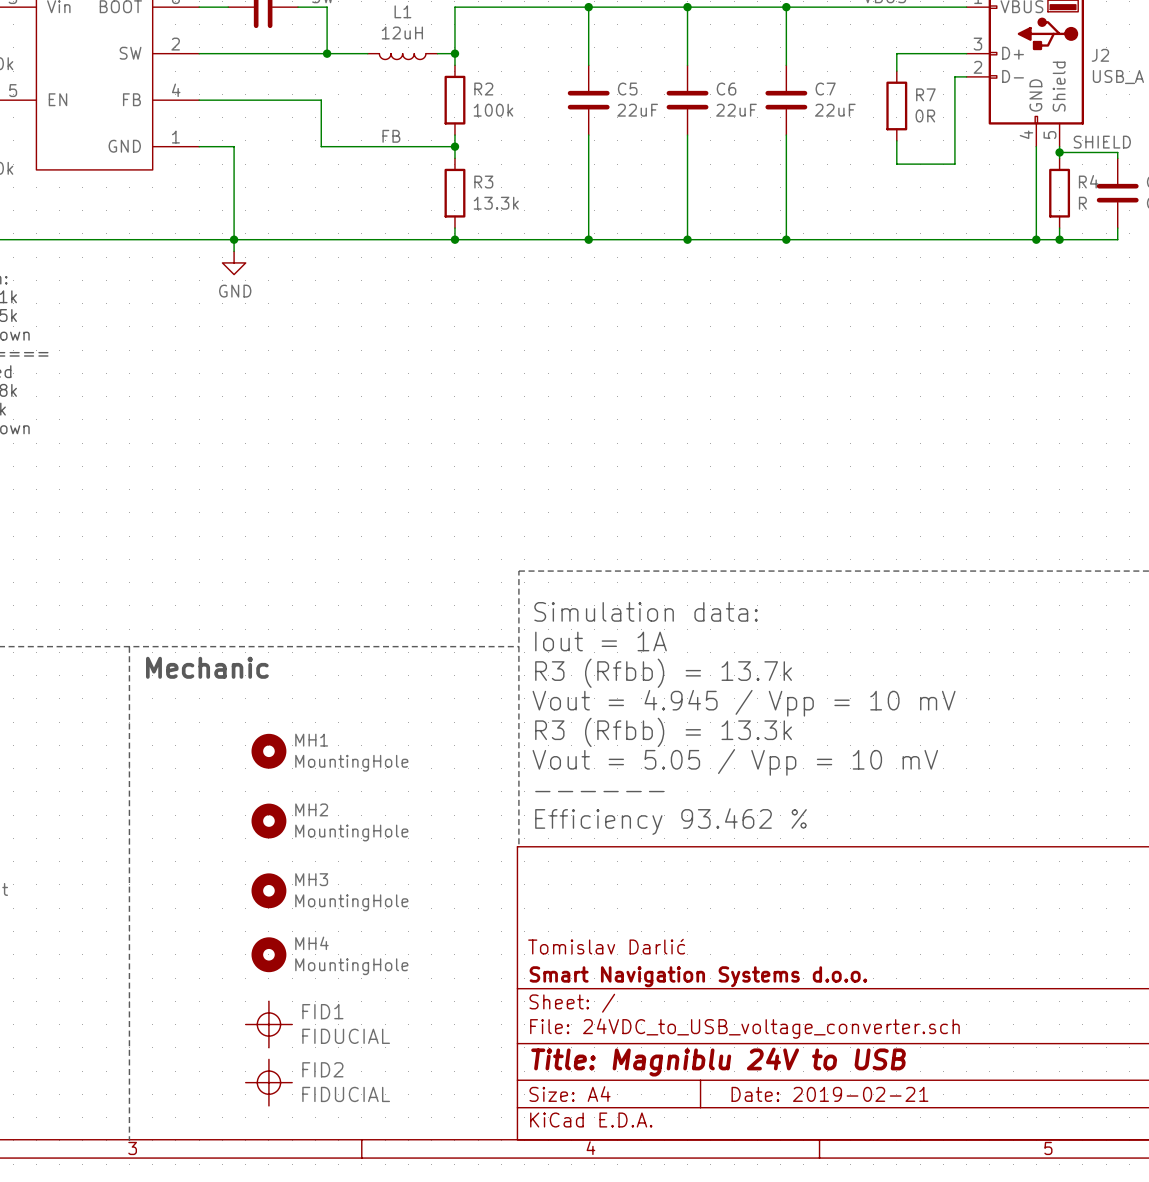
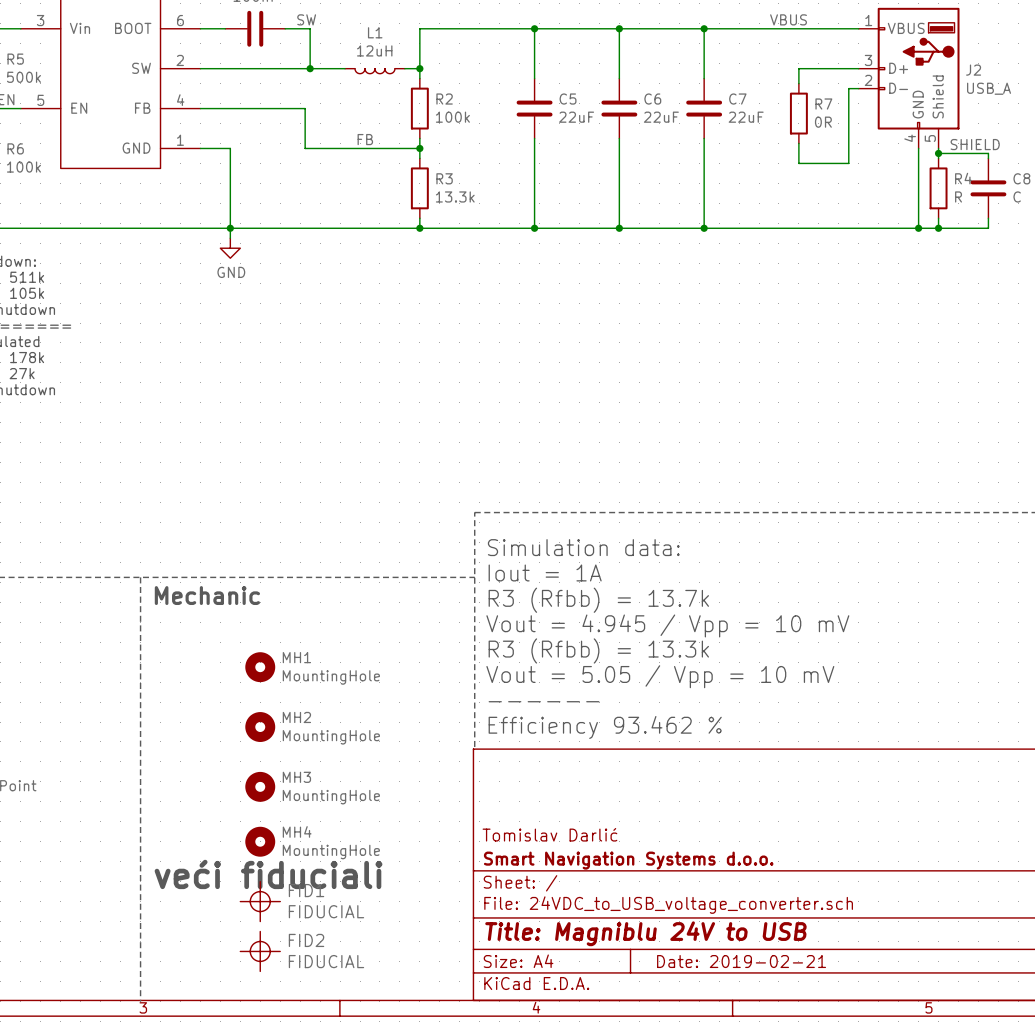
text: none -> veći fiduciali (268, 874)

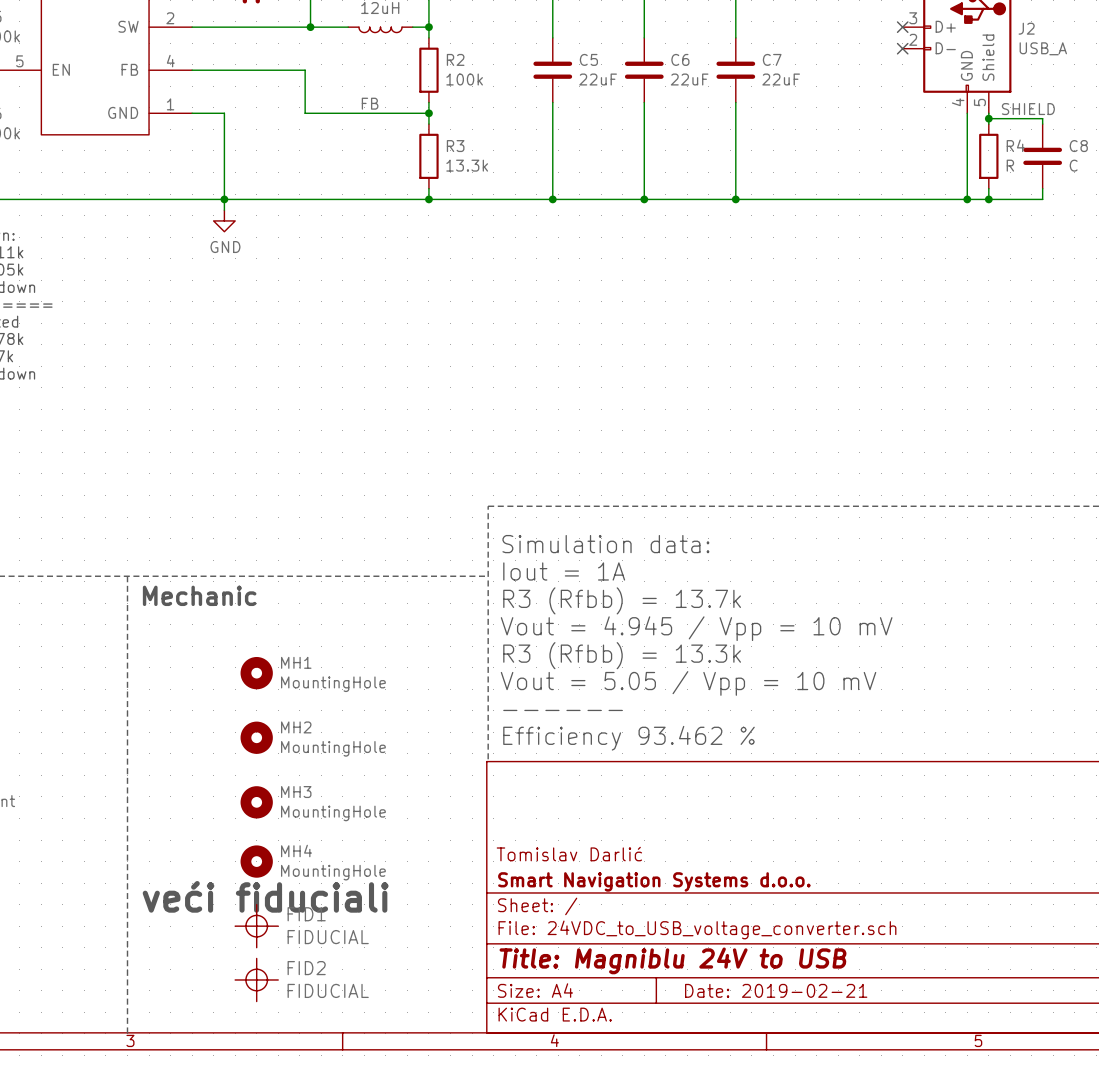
wire: (858, 68) (798, 68) (798, 83) -> none
no-connect mark: none -> (902, 27)
wire: (858, 88) (848, 88) (848, 163) (798, 163) (798, 143) -> none
no-connect mark: none -> (902, 48)
R7: 0R (798, 113) -> none

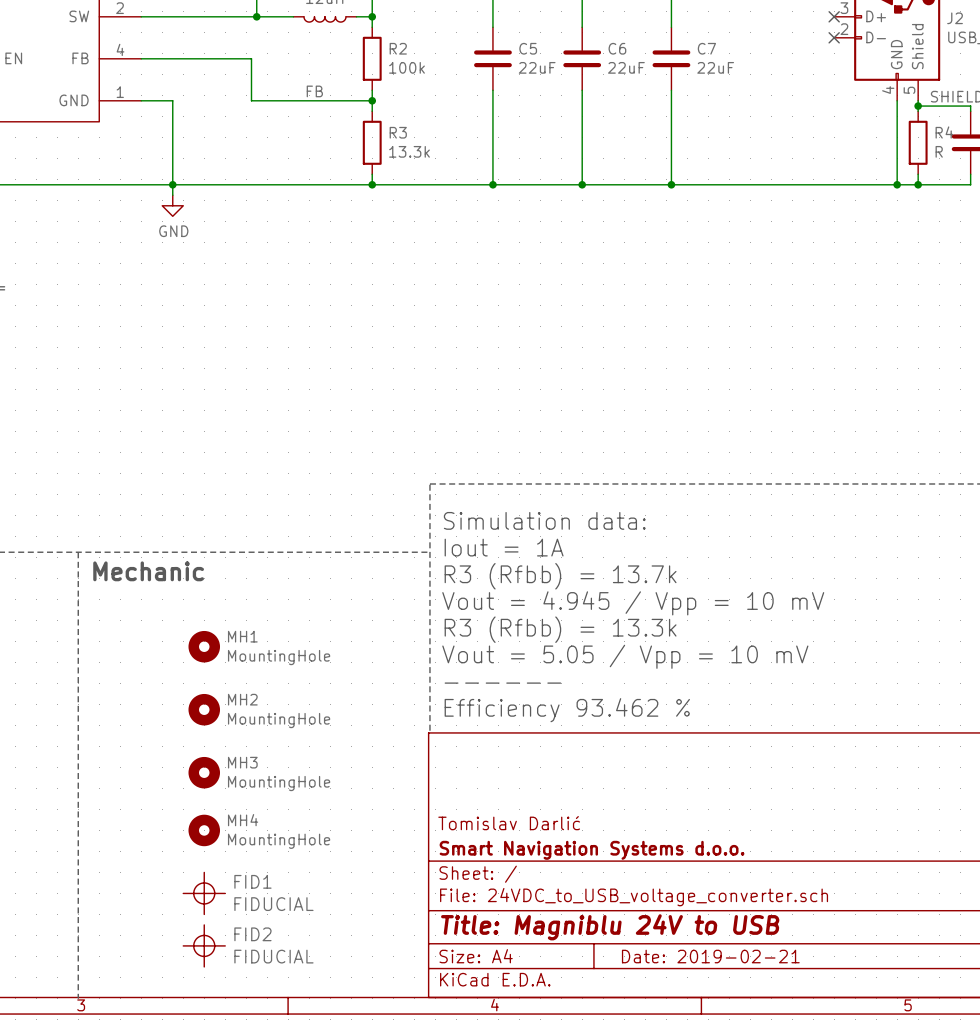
text: veći fiduciali (265, 896) -> none

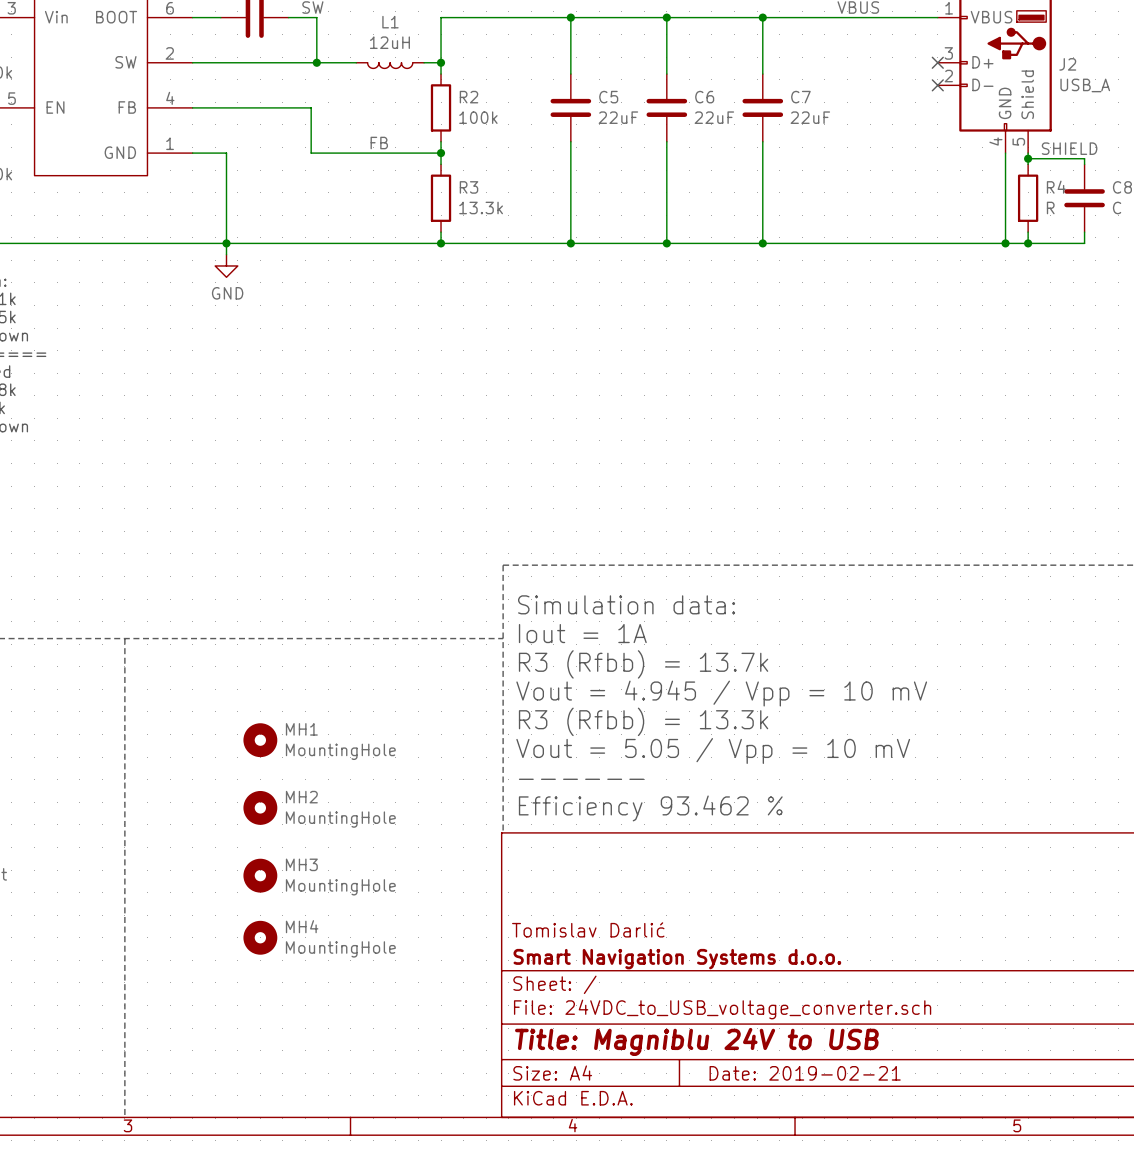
text: Mechanic (148, 571) -> none
FID1: FIDUCIAL (204, 893) -> none
FID2: FIDUCIAL (204, 945) -> none

